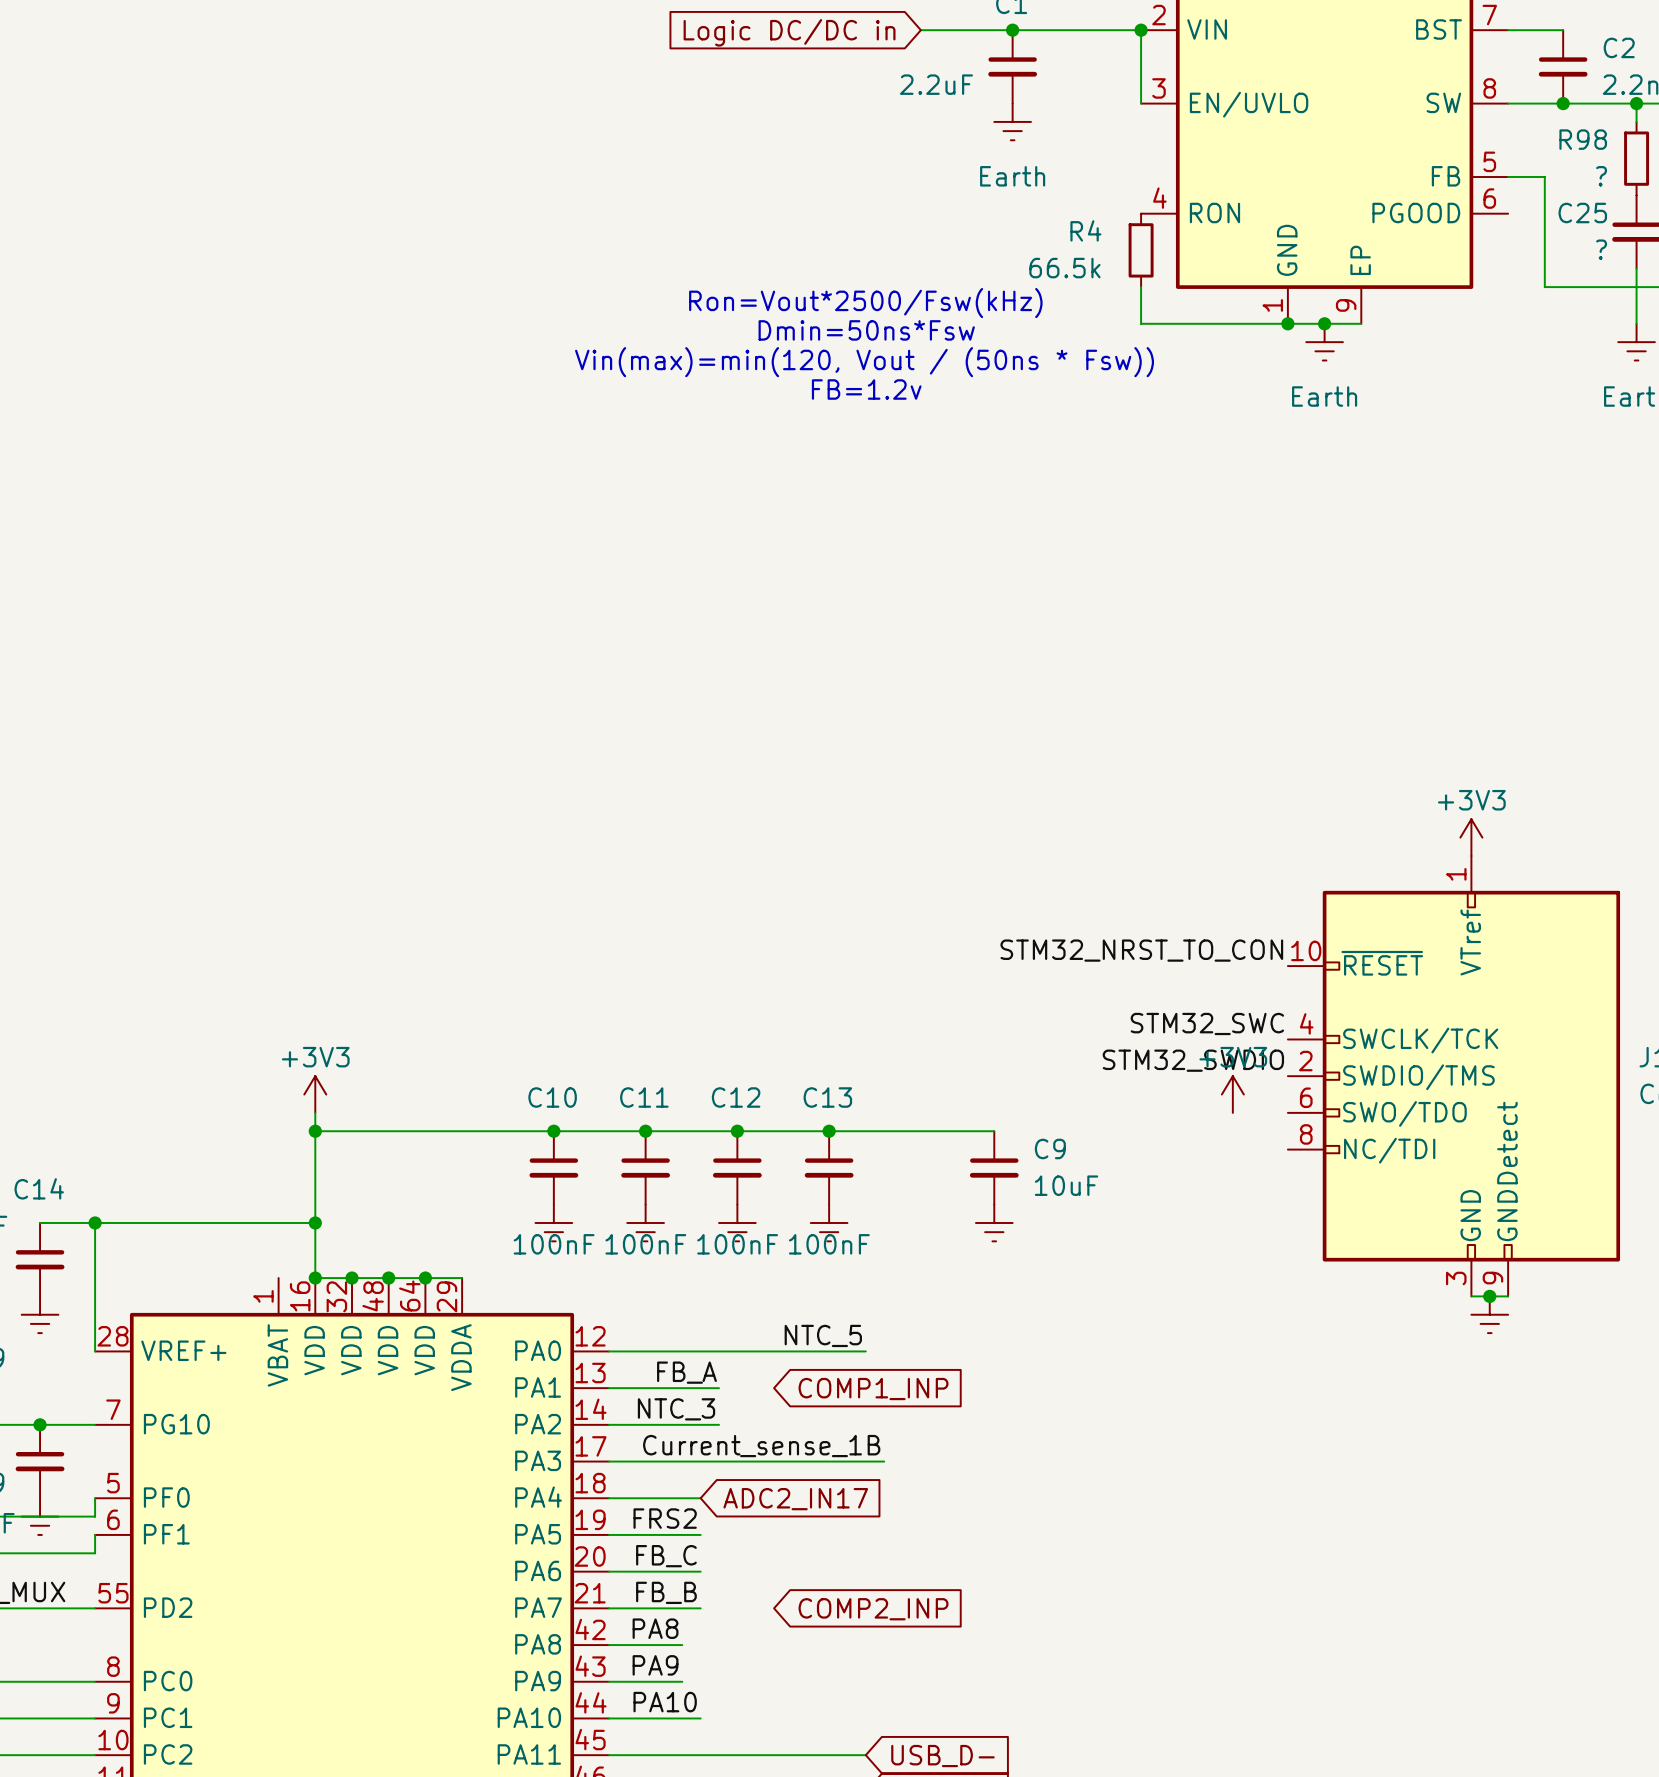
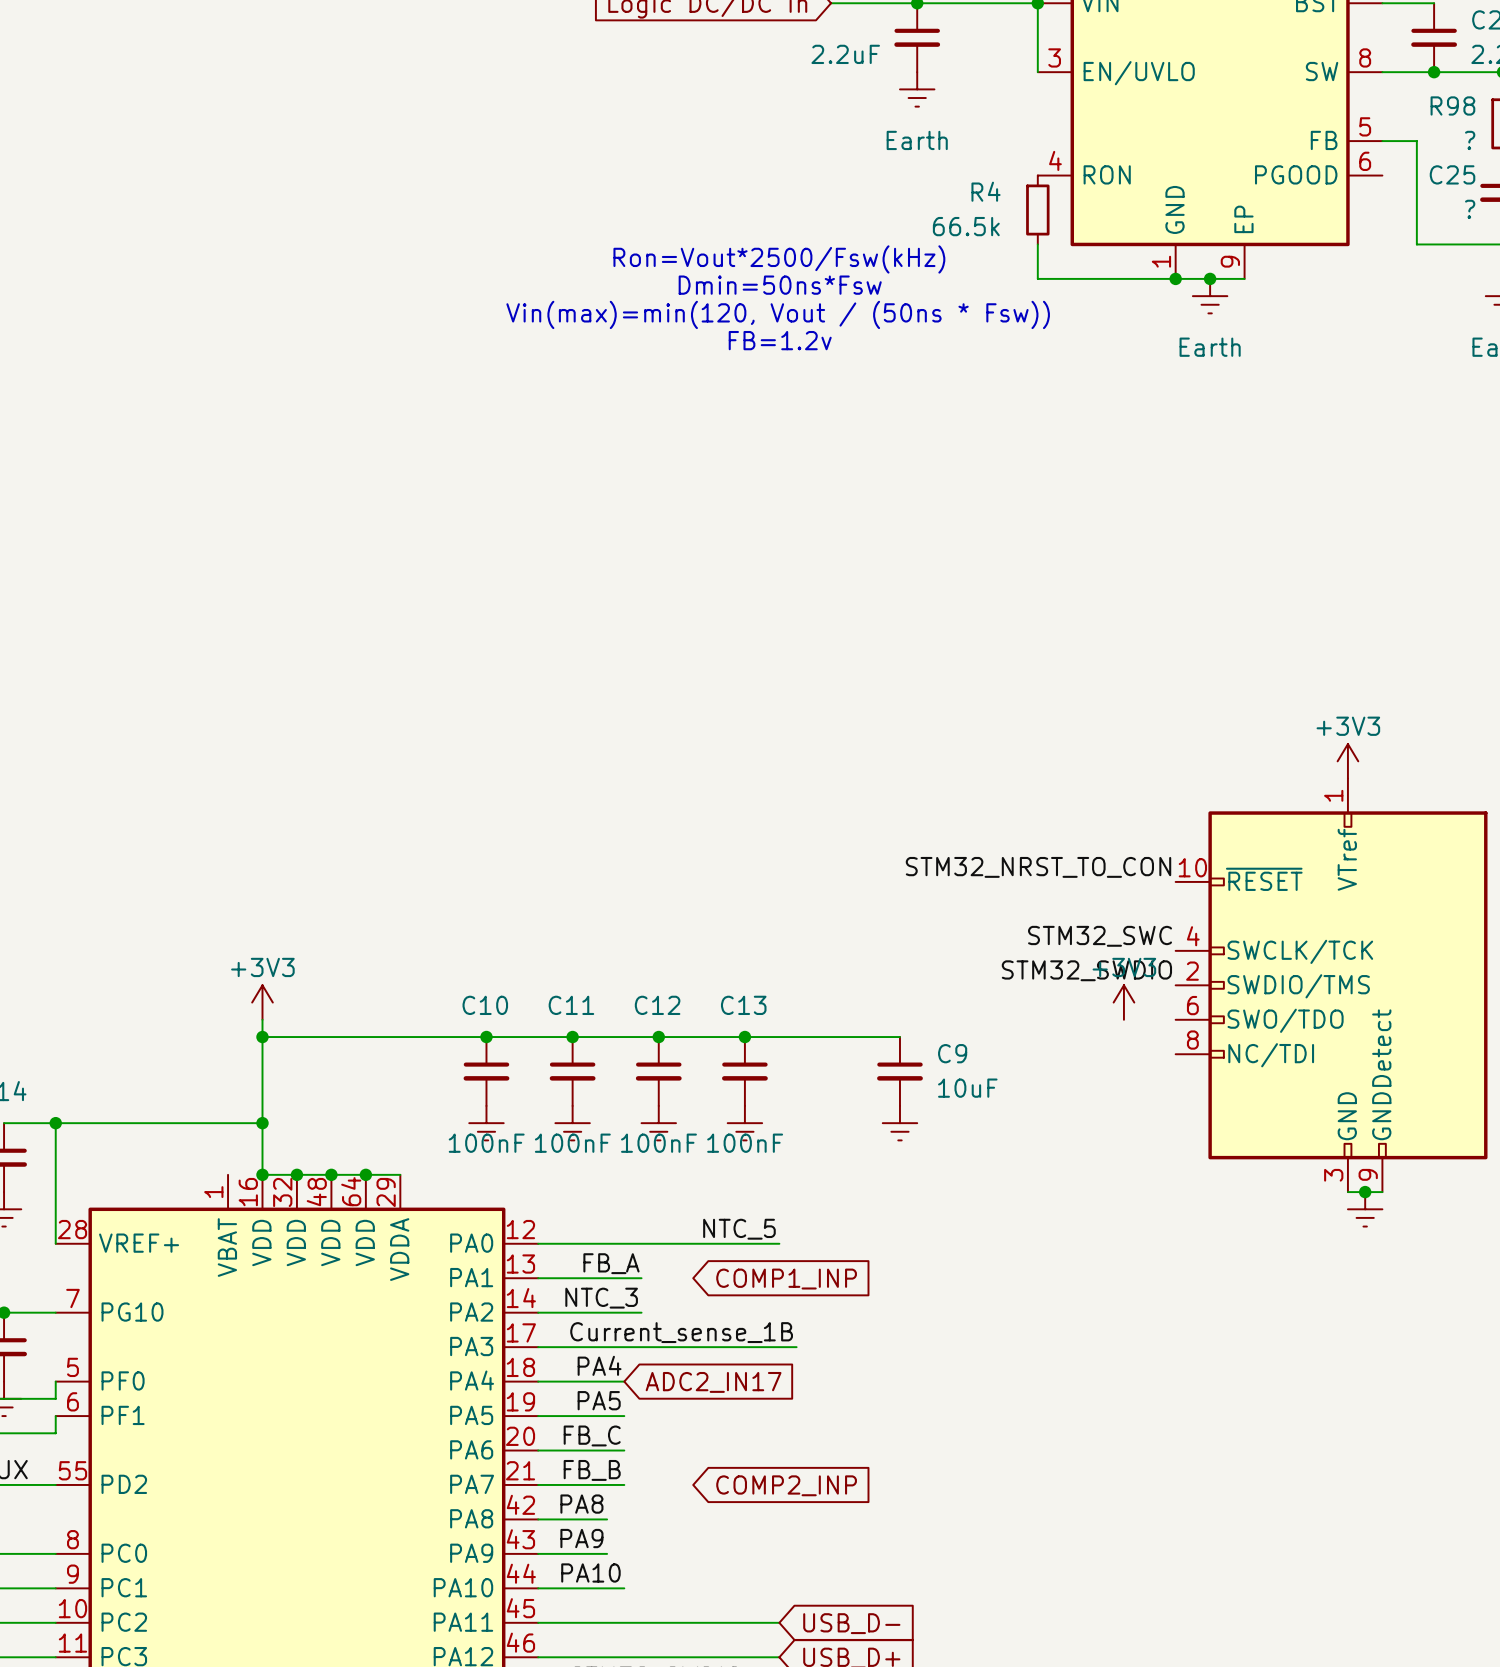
label: none -> PA4 (599, 1365)
label: FRS2 (665, 1518) -> PA5 (599, 1400)

